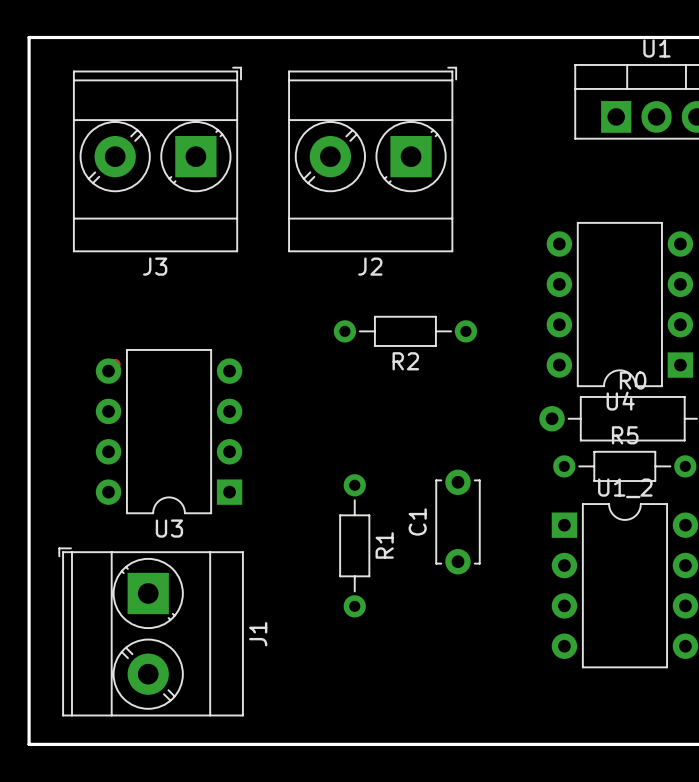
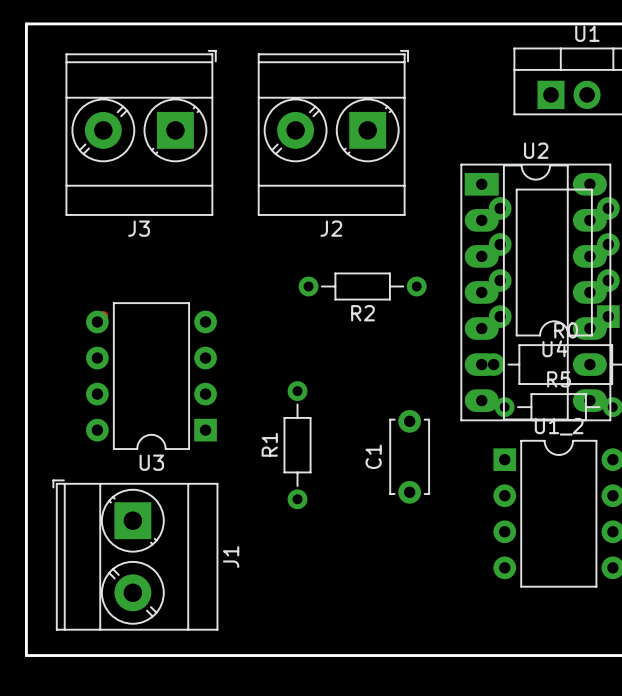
U2: none -> (535, 292)
R1 position: (354, 545) -> (297, 445)
R1 name position: R1 (384, 545) -> R1 (269, 444)

